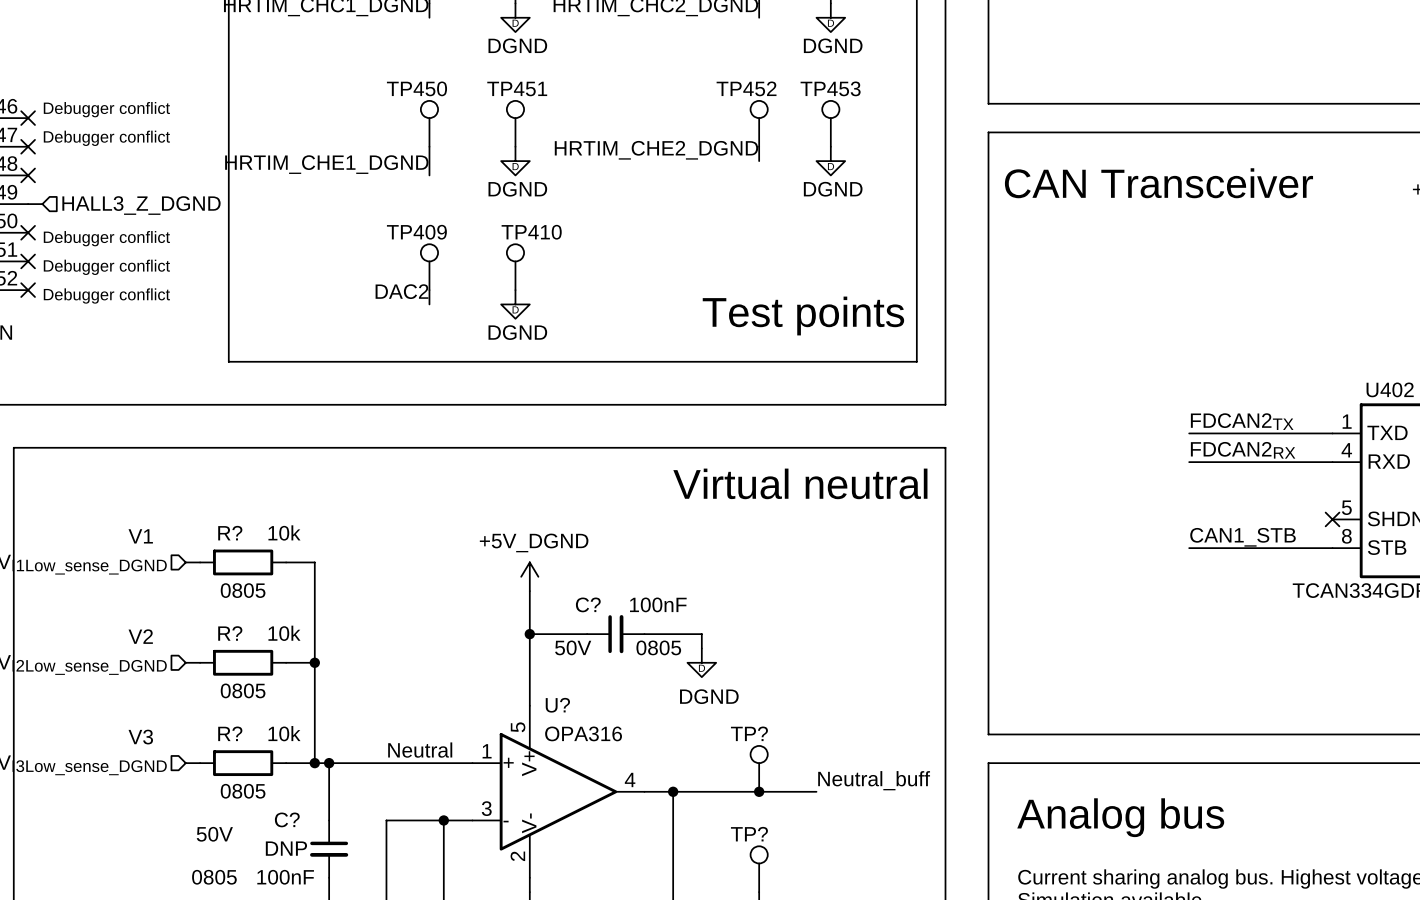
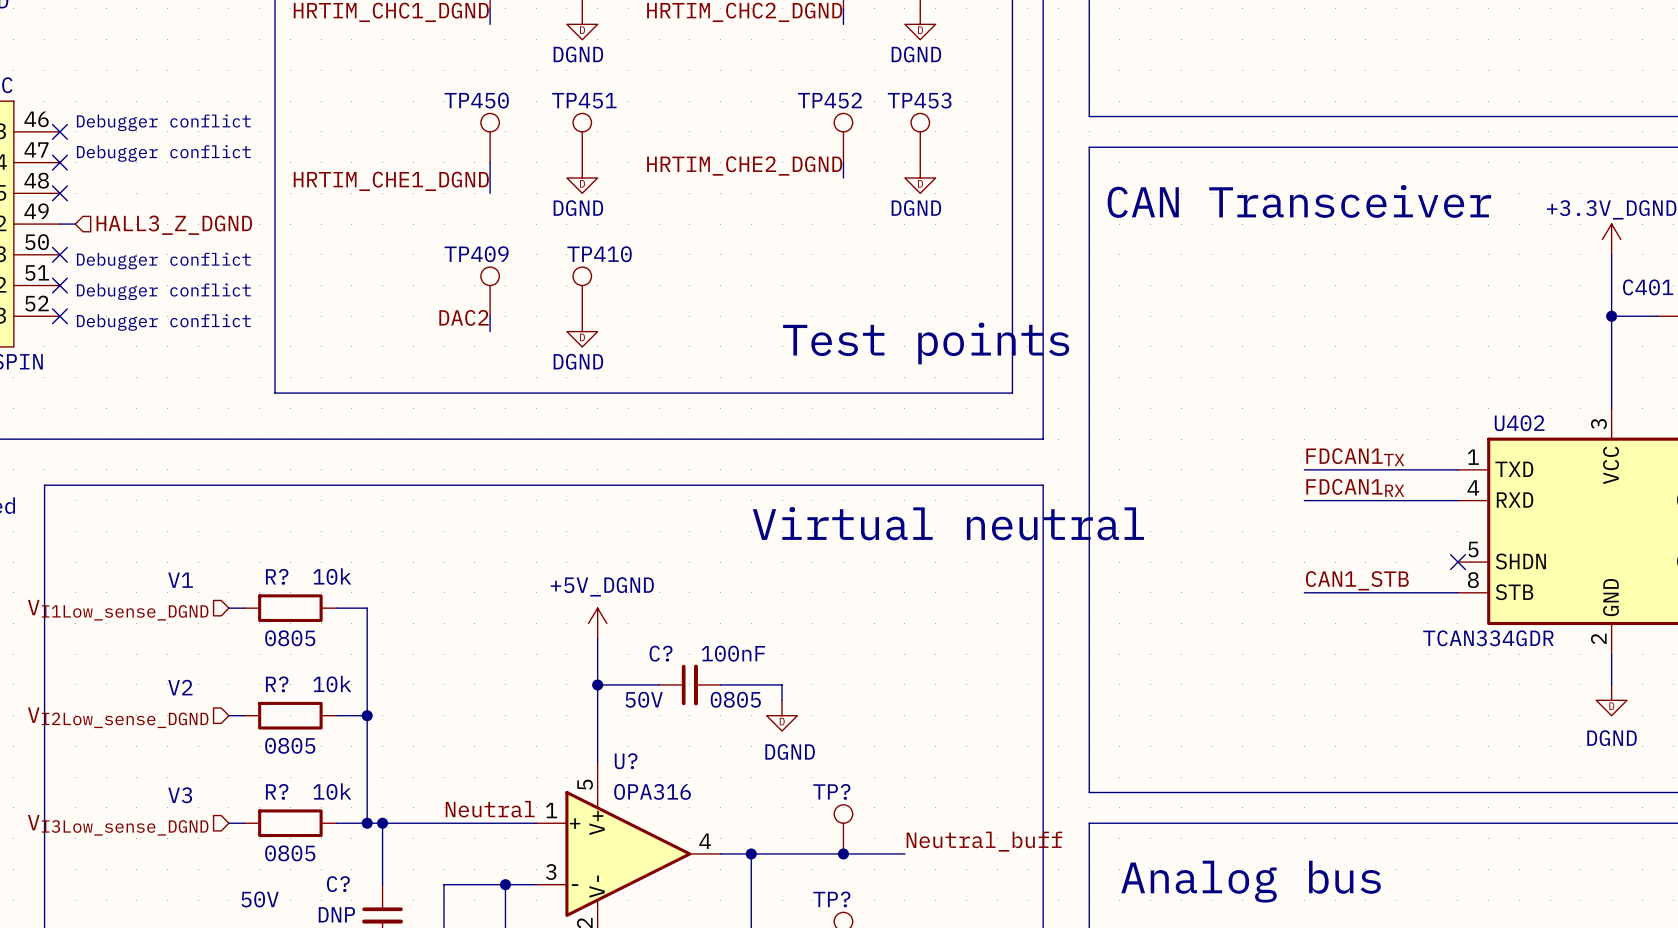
label: FDCAN2TX (1242, 421) -> FDCAN1TX (1355, 457)
label: FDCAN2RX (1243, 450) -> FDCAN1RX (1355, 487)

